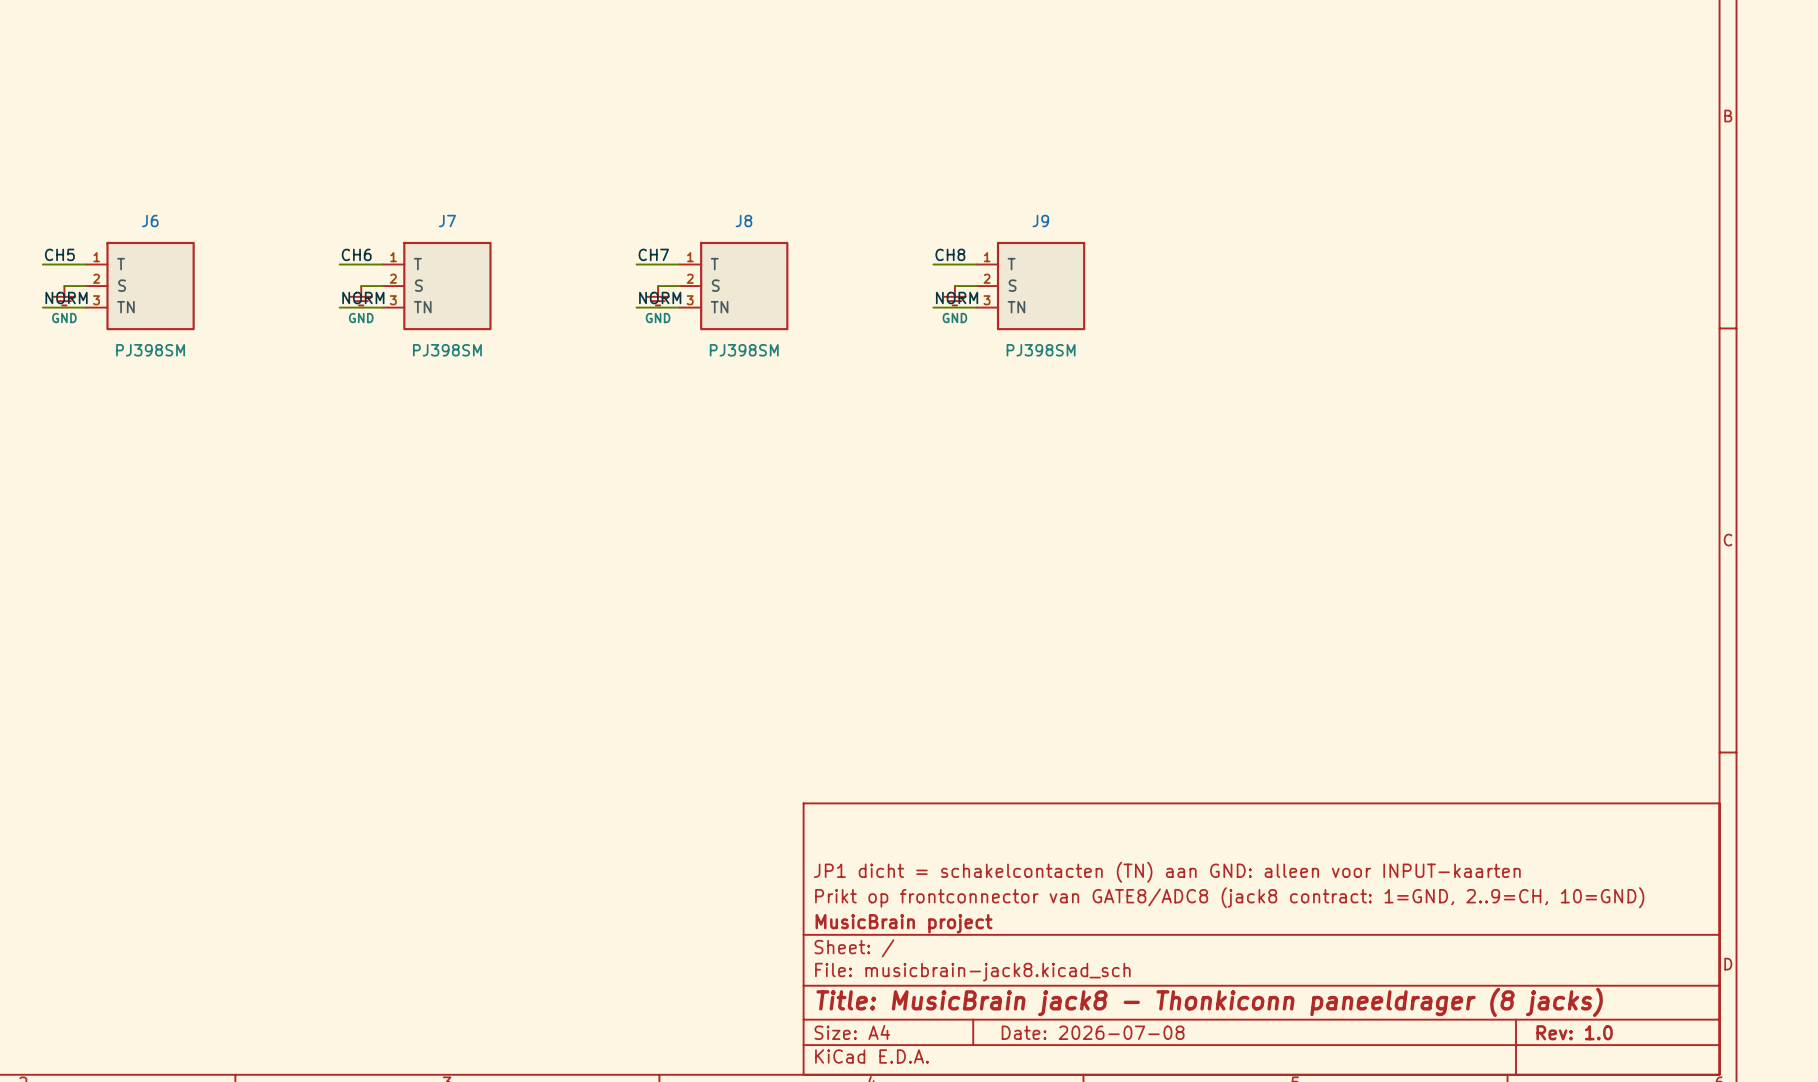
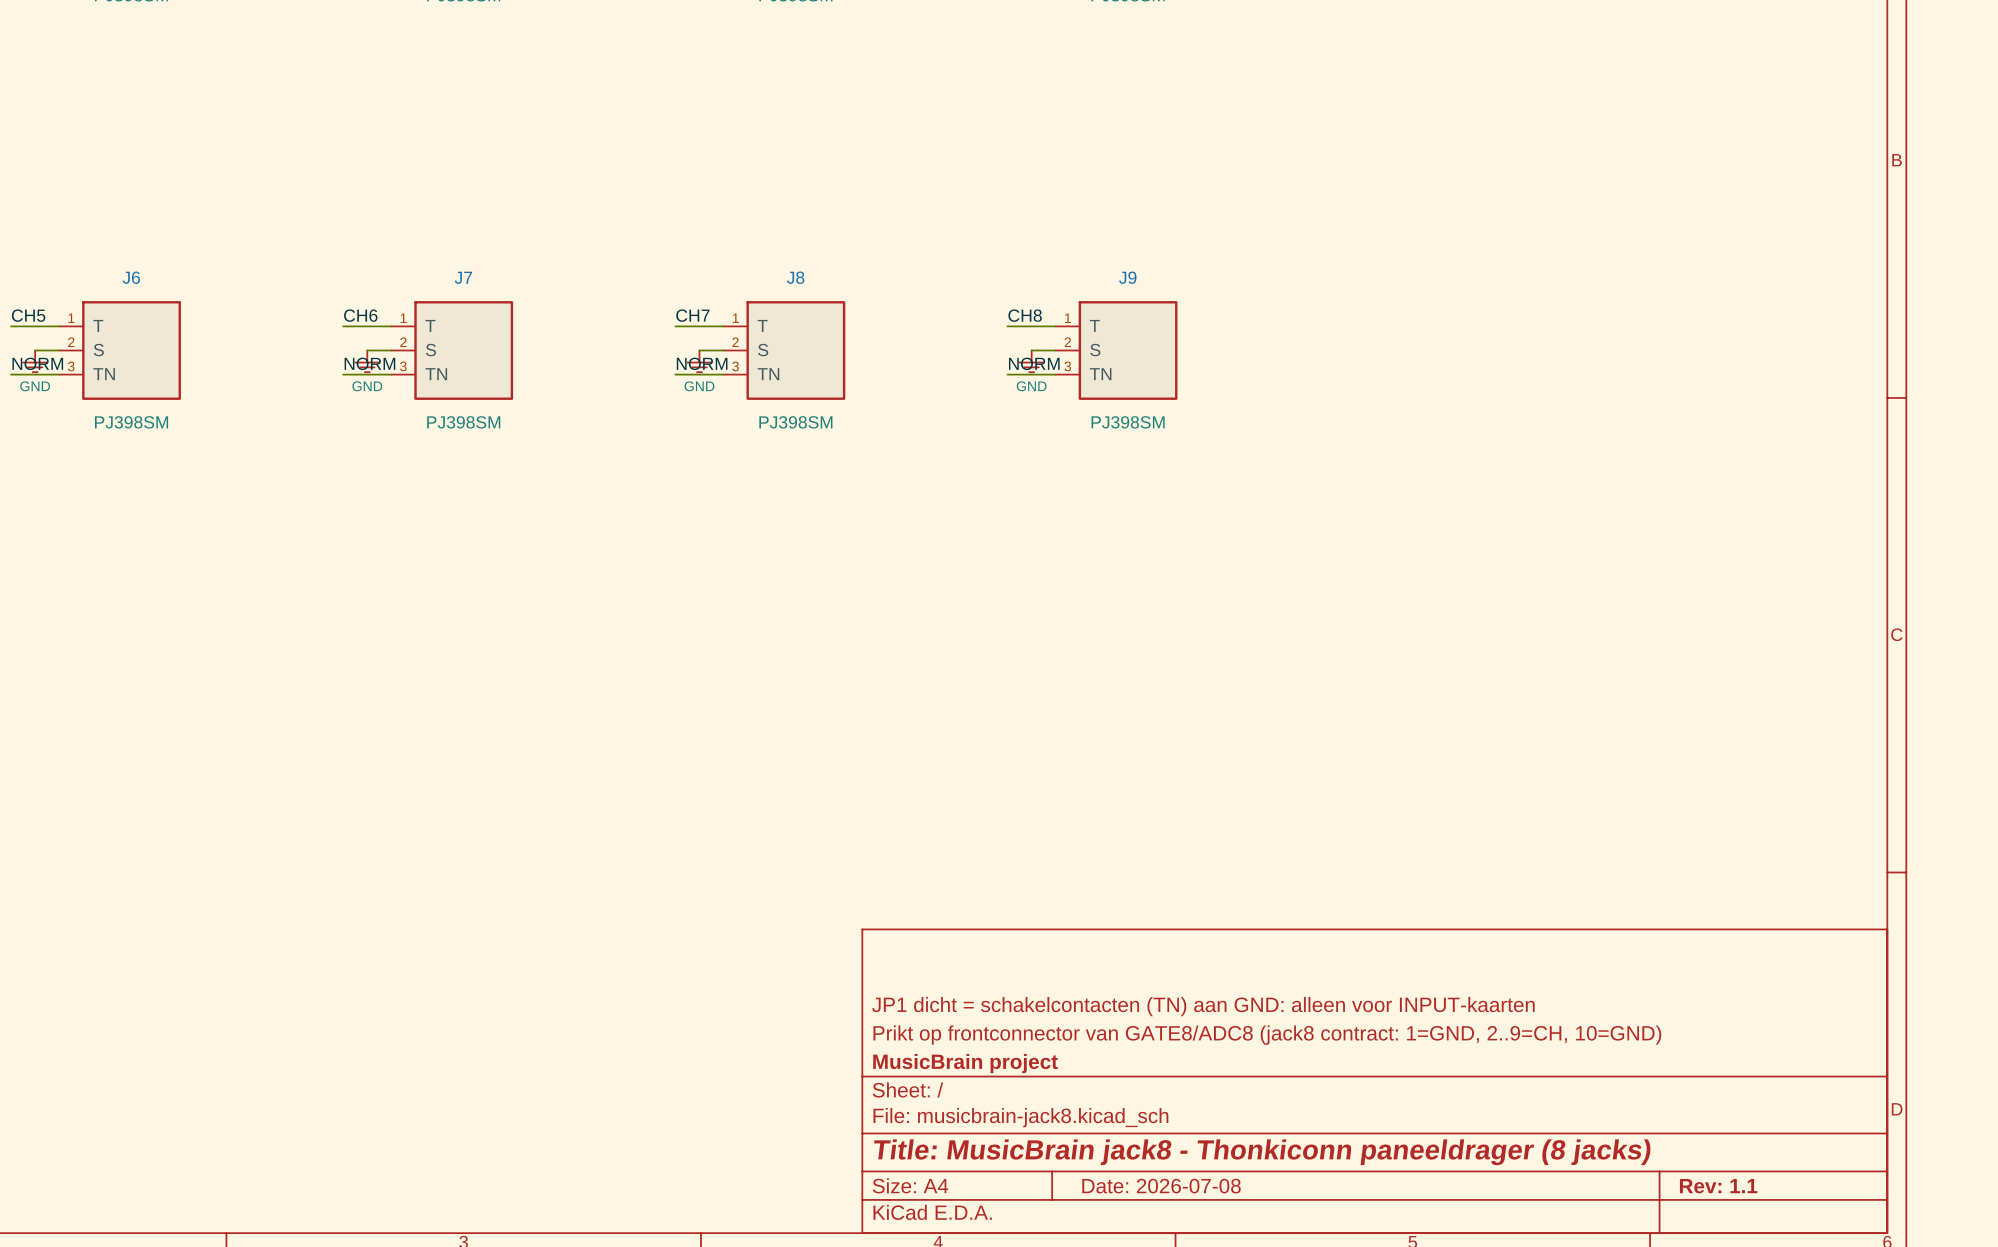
title block: Rev: 1.0 (1574, 1032) -> Rev: 1.1 (1718, 1186)

